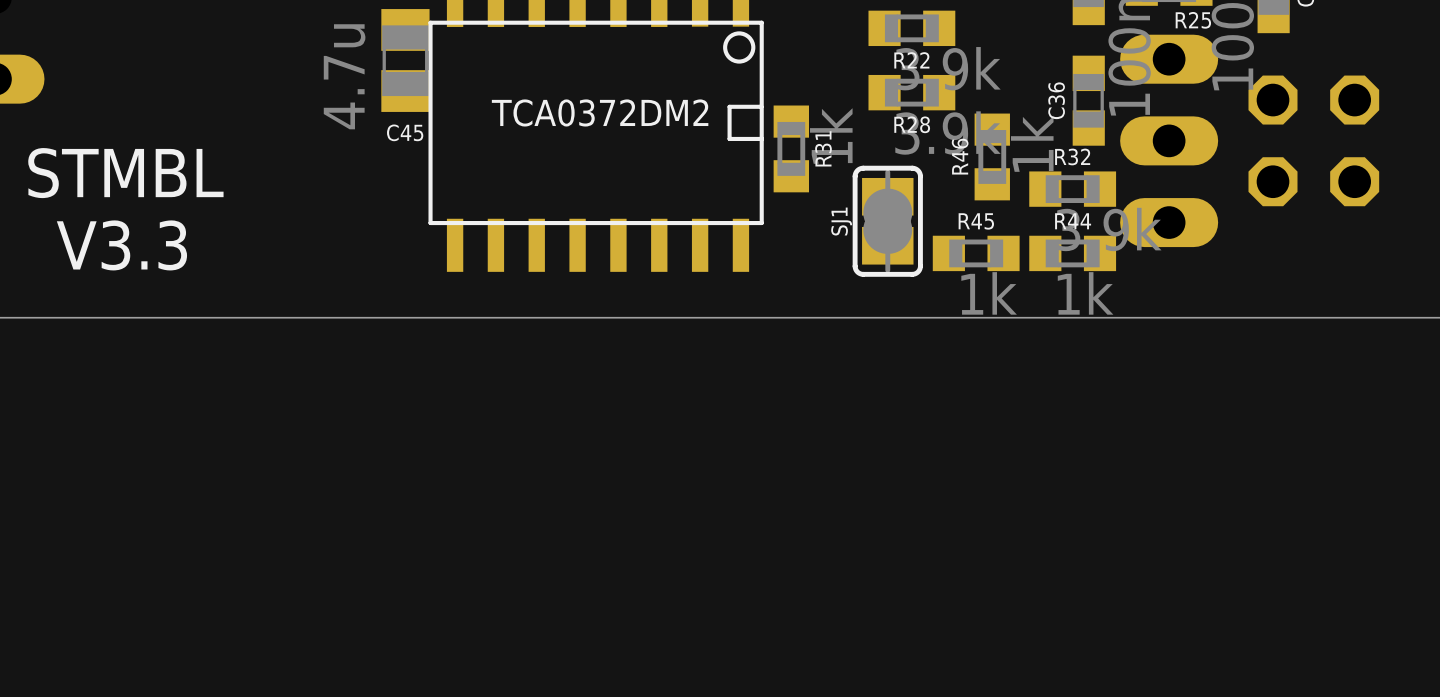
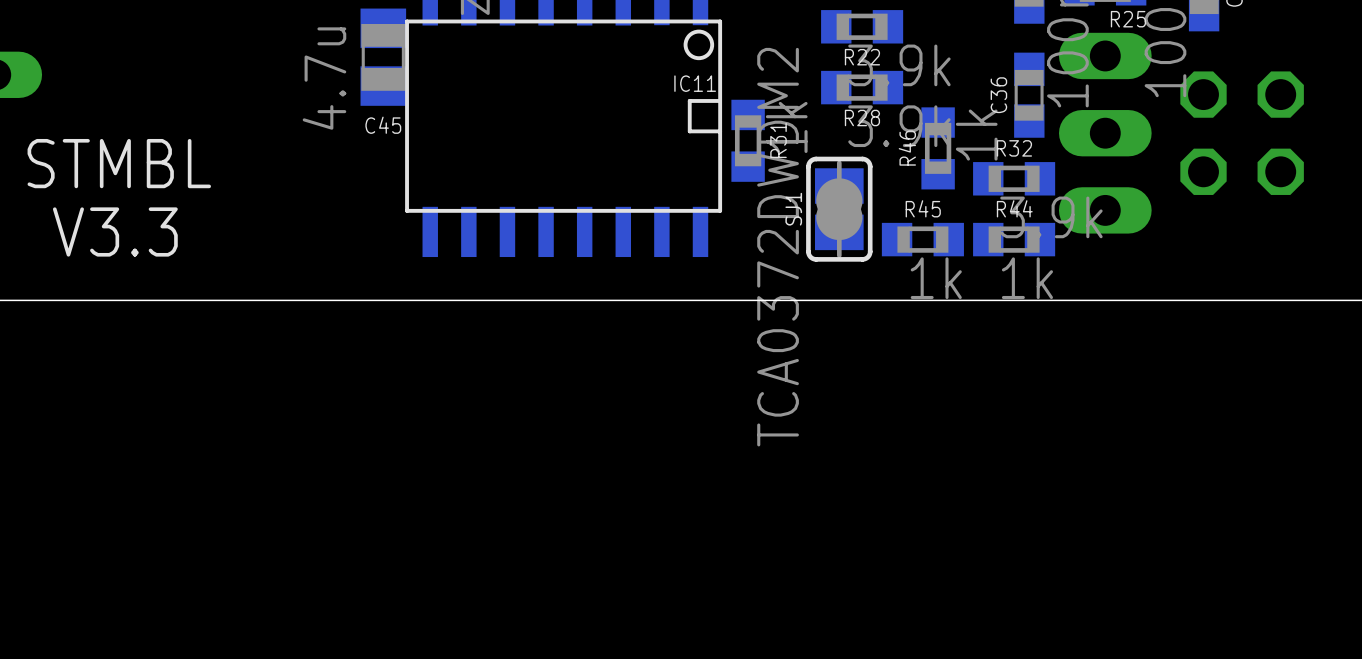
IC11 name: none -> IC11 (695, 83)
IC11 text: TCA0372DM2 (600, 112) -> none
IC11 value: none -> TCA0372DWDM2 (778, 247)

